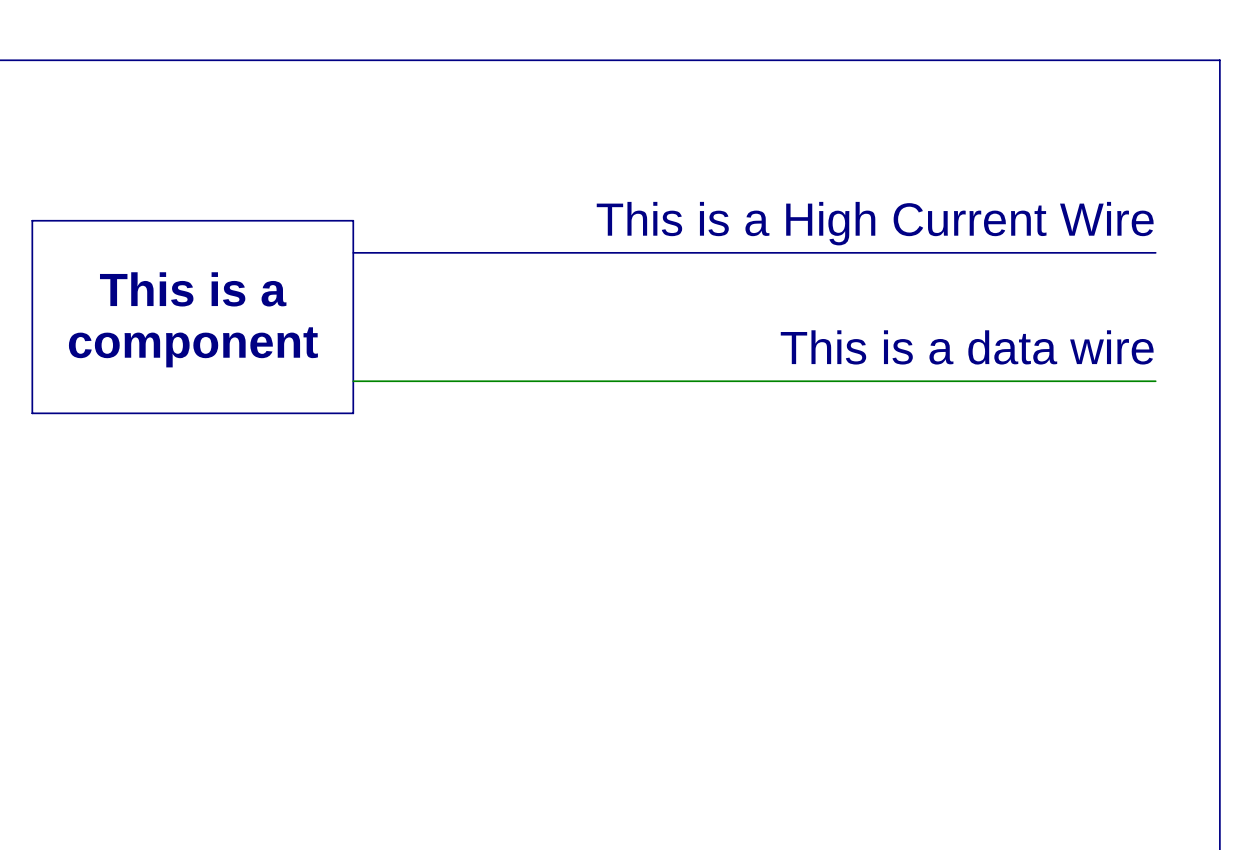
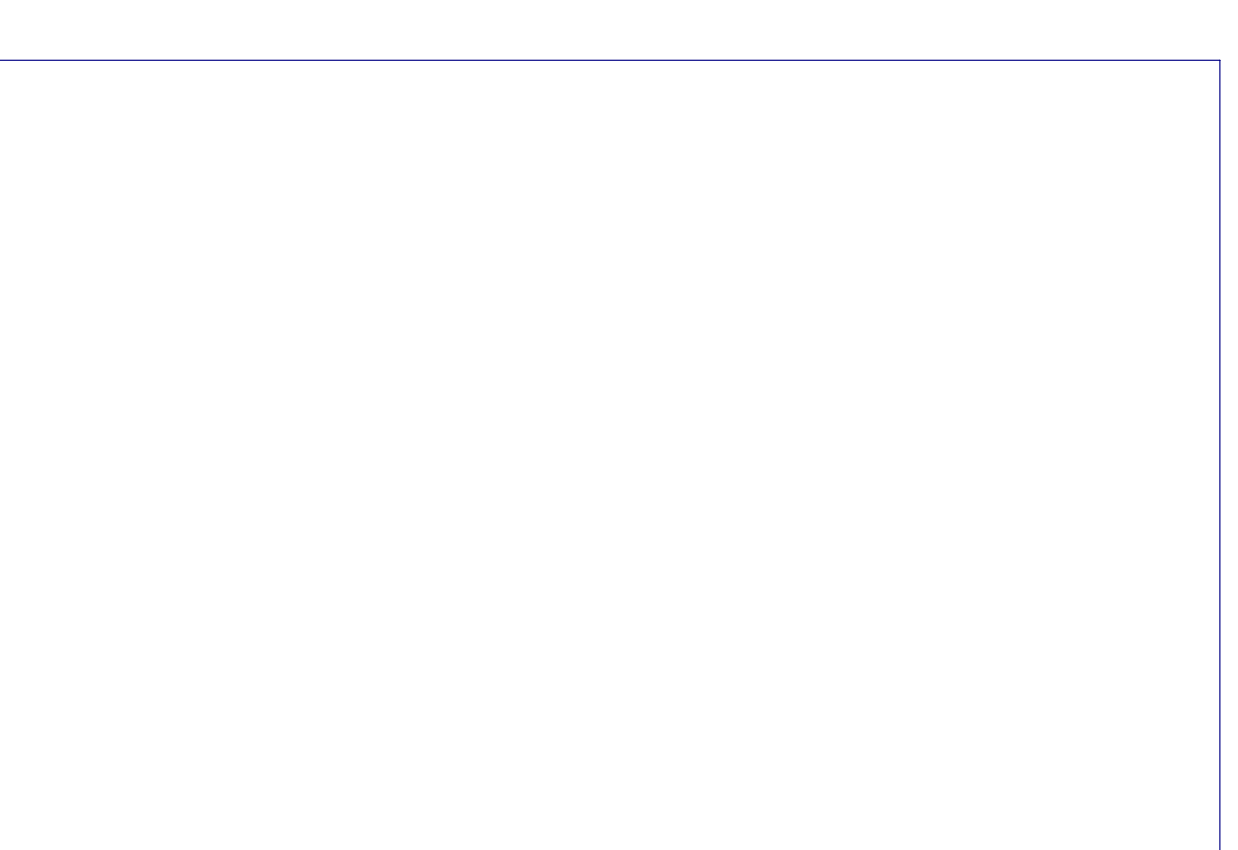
line: (32, 220) (353, 220) (353, 413) (32, 413) (32, 220) -> none
text: This is a High Current Wire (875, 223) -> none
bus: (353, 252) (1155, 252) -> none
text: This is a (193, 289) -> none
text: component (193, 347) -> none
text: This is a data wire (967, 347) -> none
wire: (353, 381) (1155, 381) -> none

